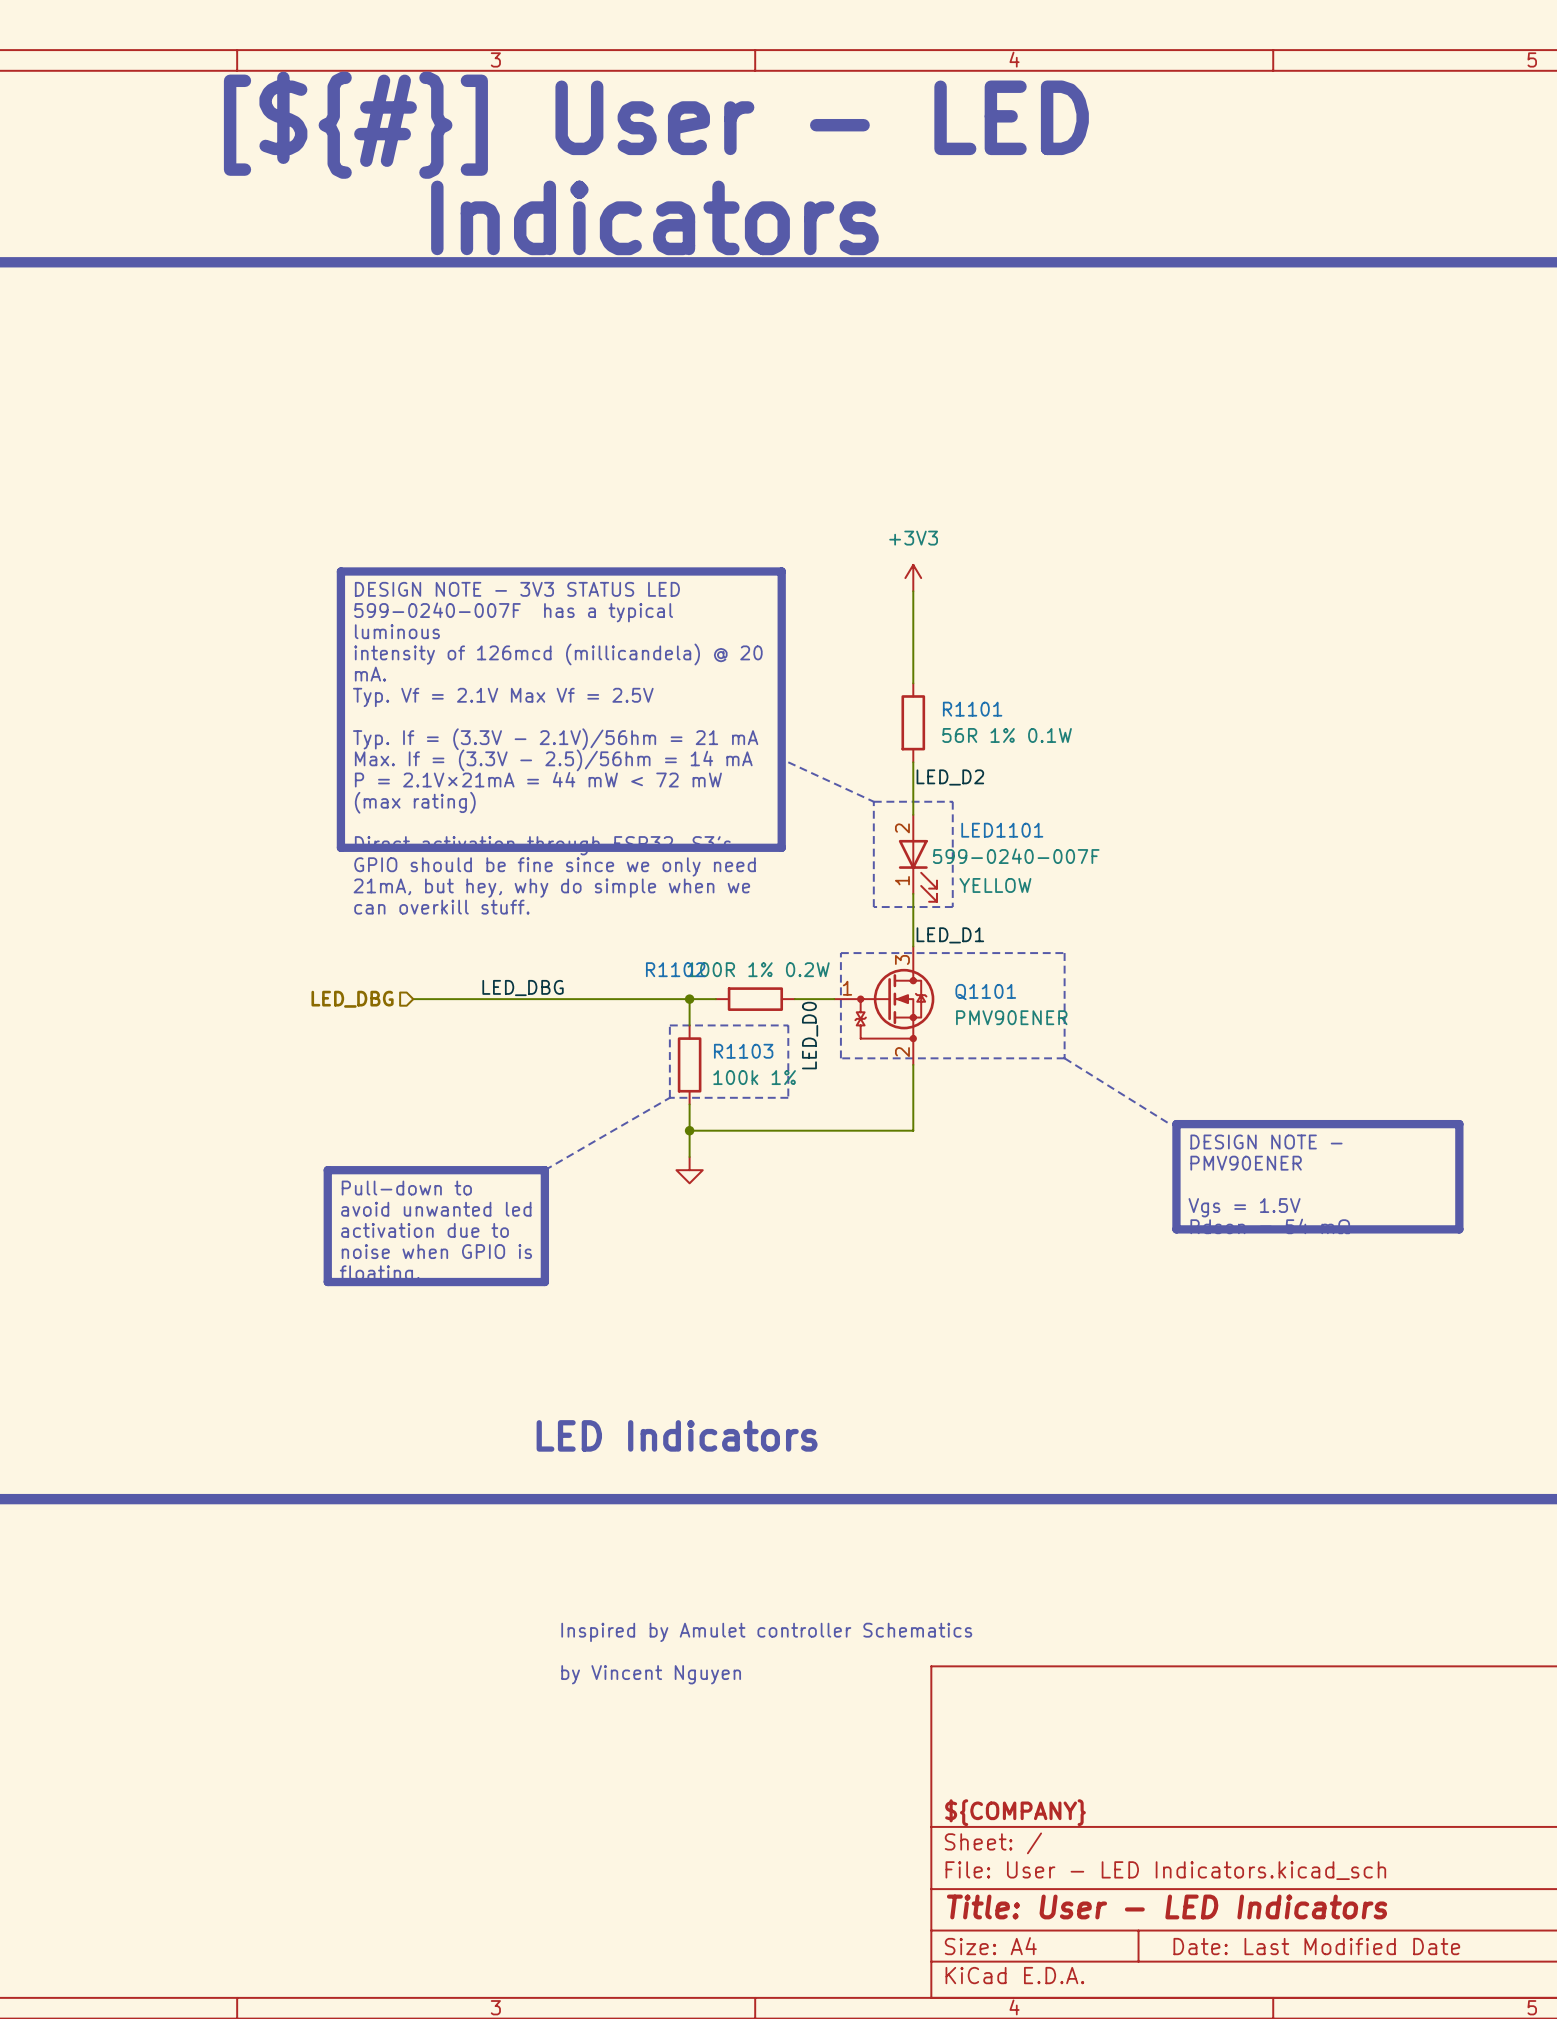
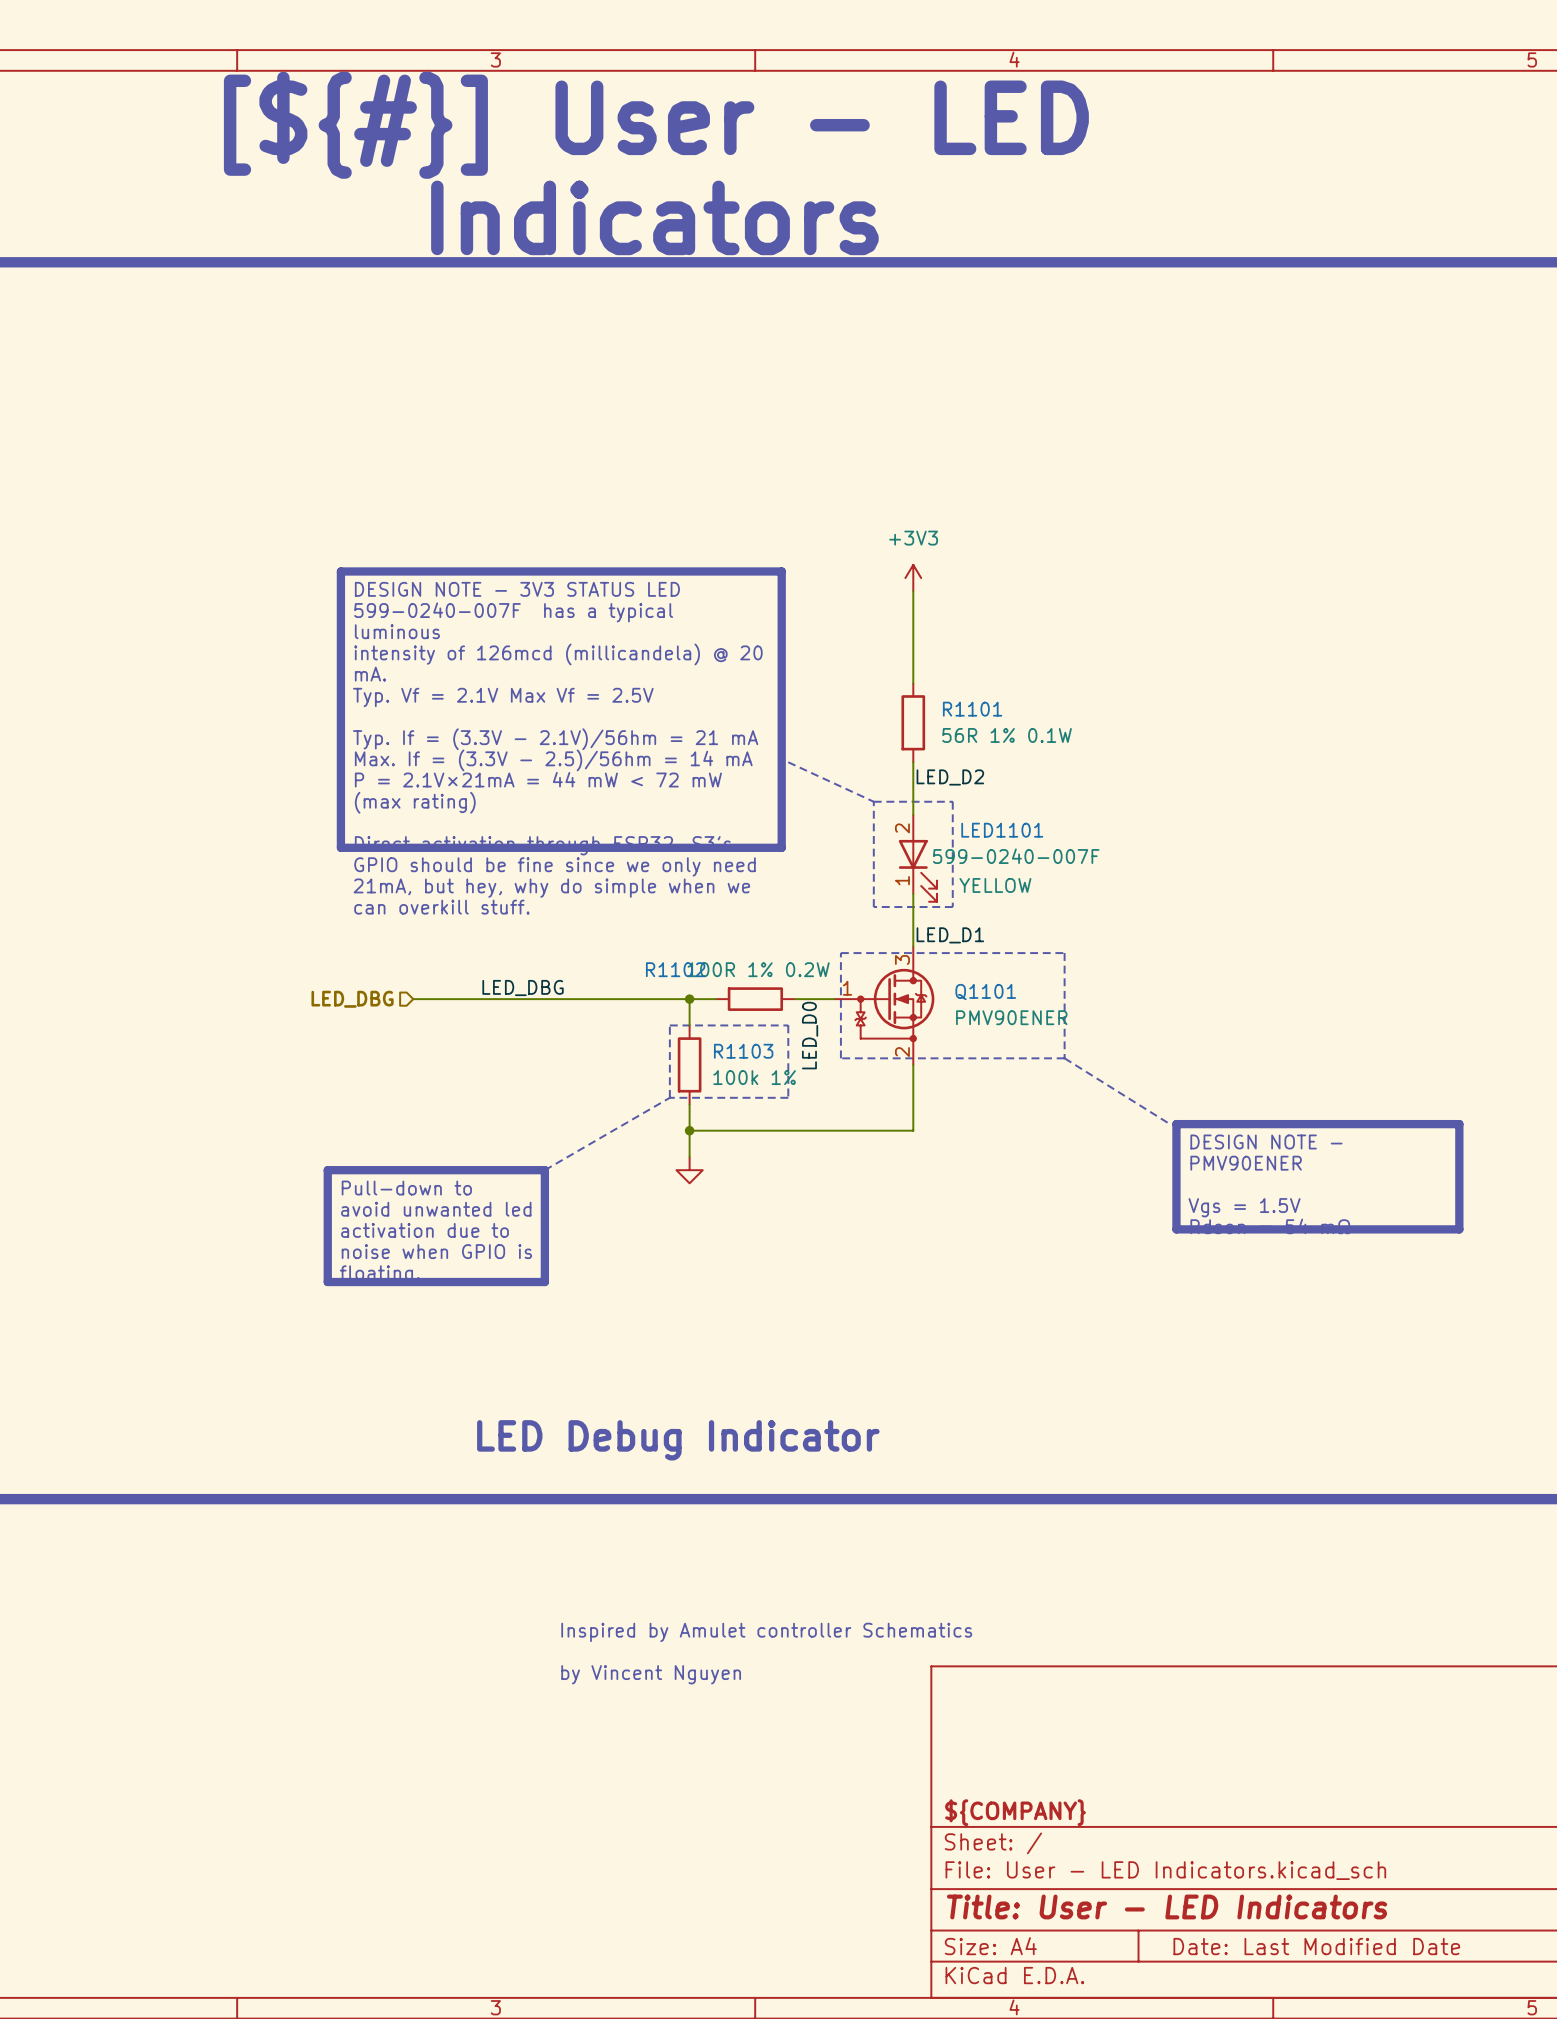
text: LED Indicators (677, 1435) -> LED Debug Indicator (678, 1440)

